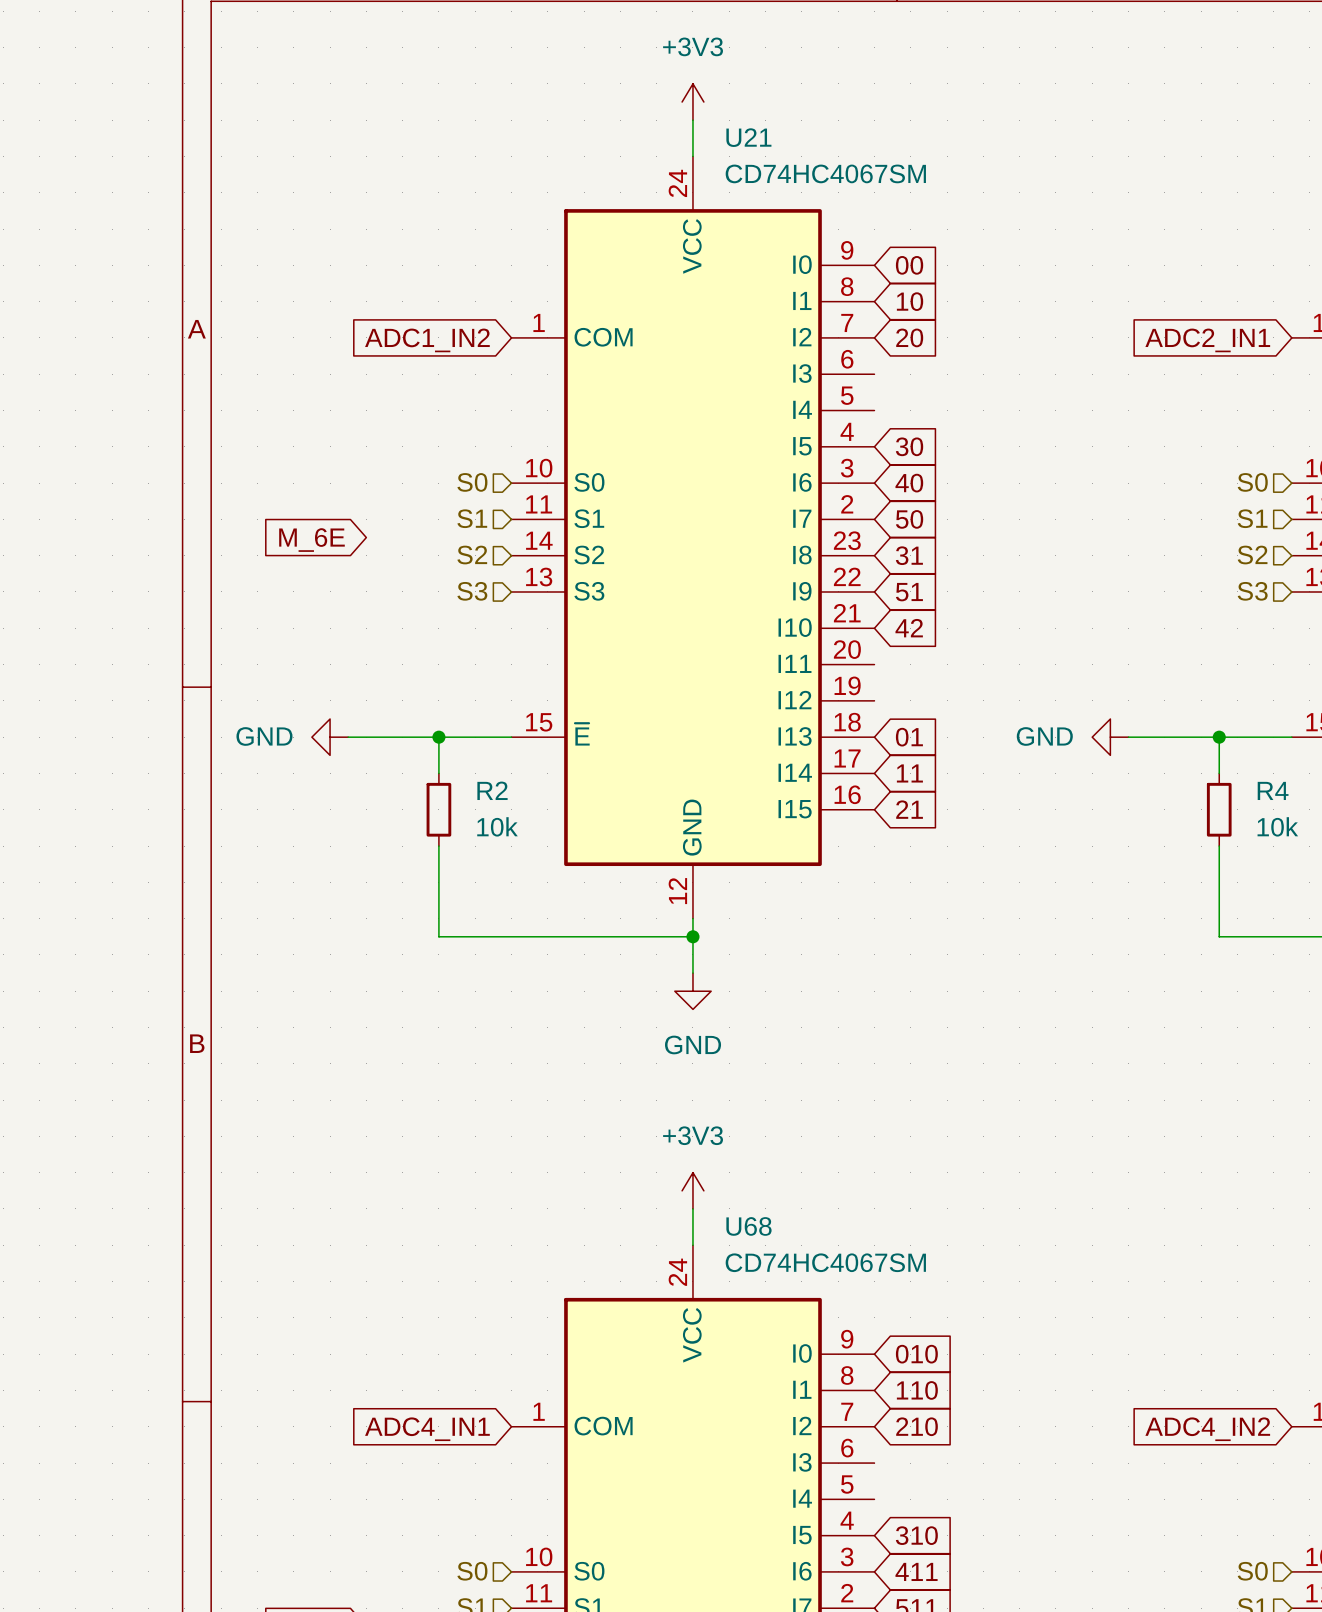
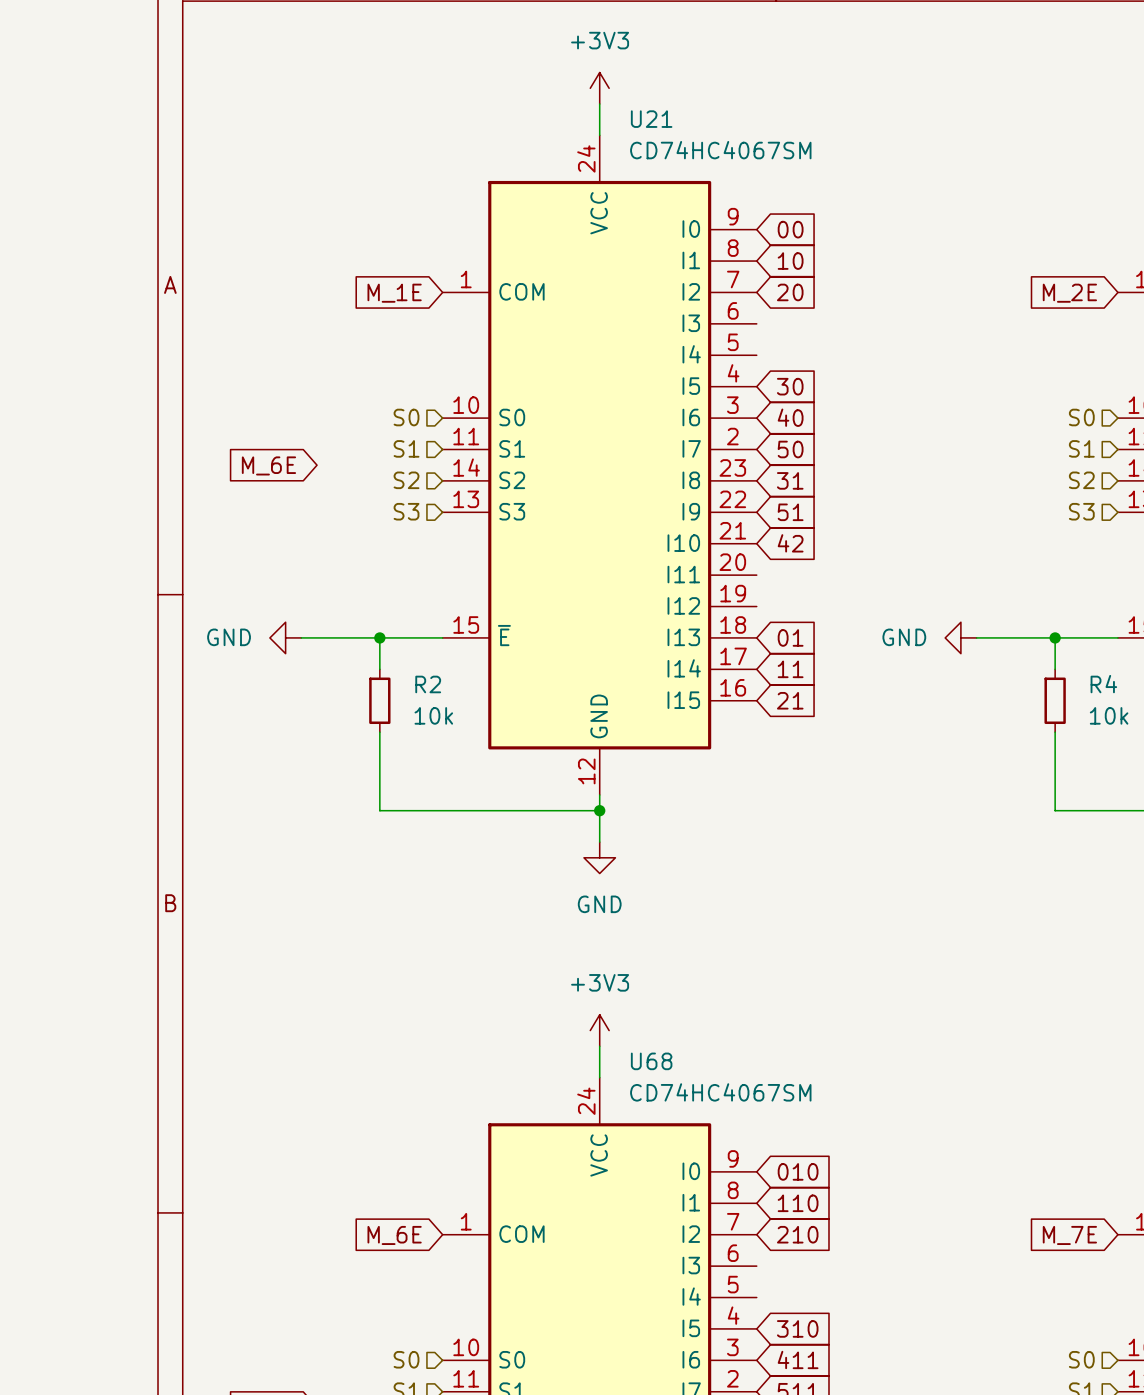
global label: ADC1_IN2 (427, 340) -> M_1E (394, 293)
global label: ADC2_IN1 (1207, 340) -> M_2E (1069, 293)
global label: ADC4_IN1 (427, 1429) -> M_6E (394, 1235)
global label: ADC4_IN2 (1207, 1429) -> M_7E (1069, 1235)

